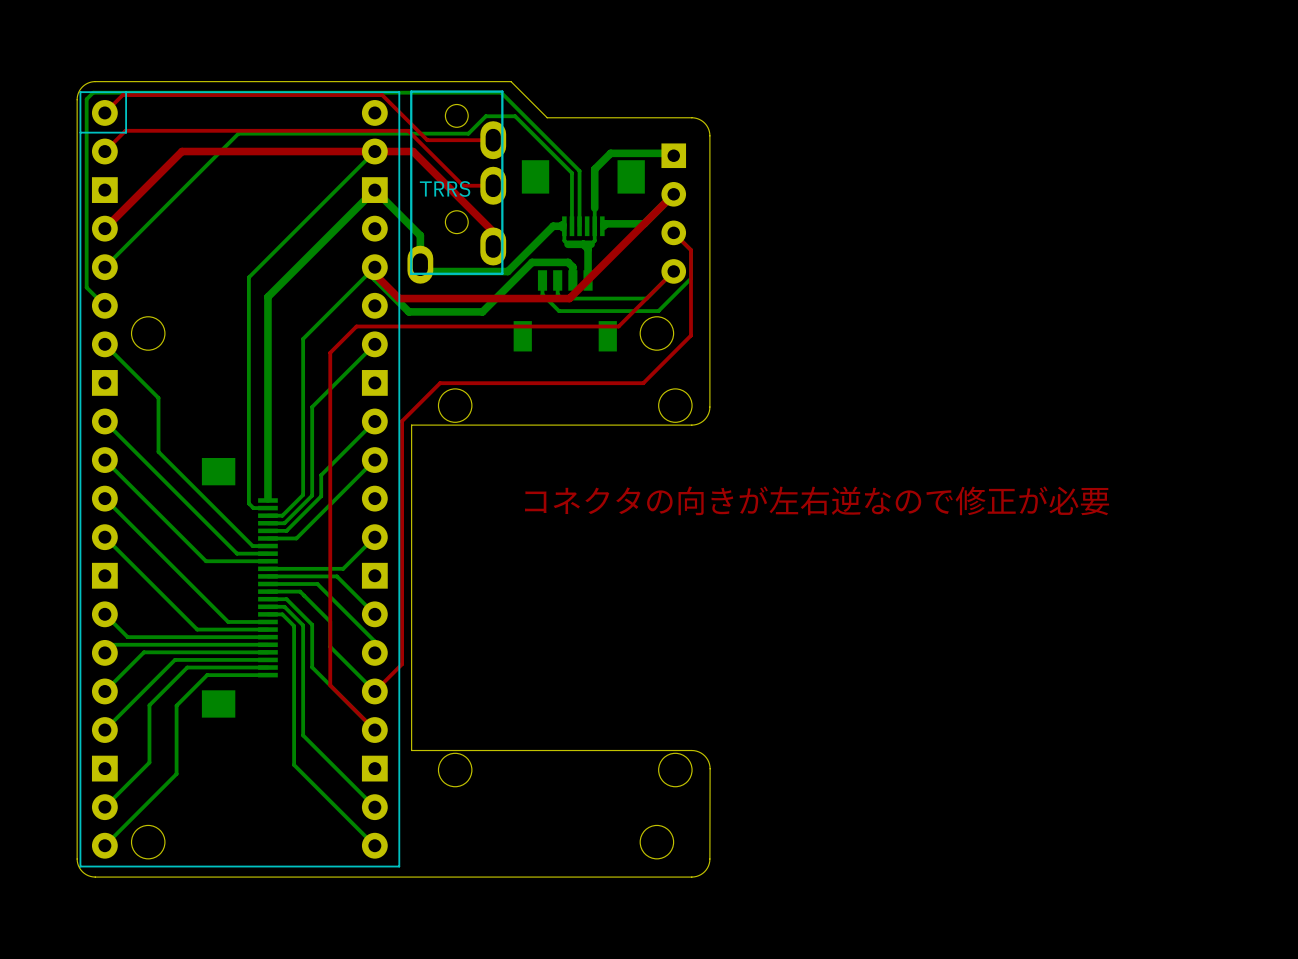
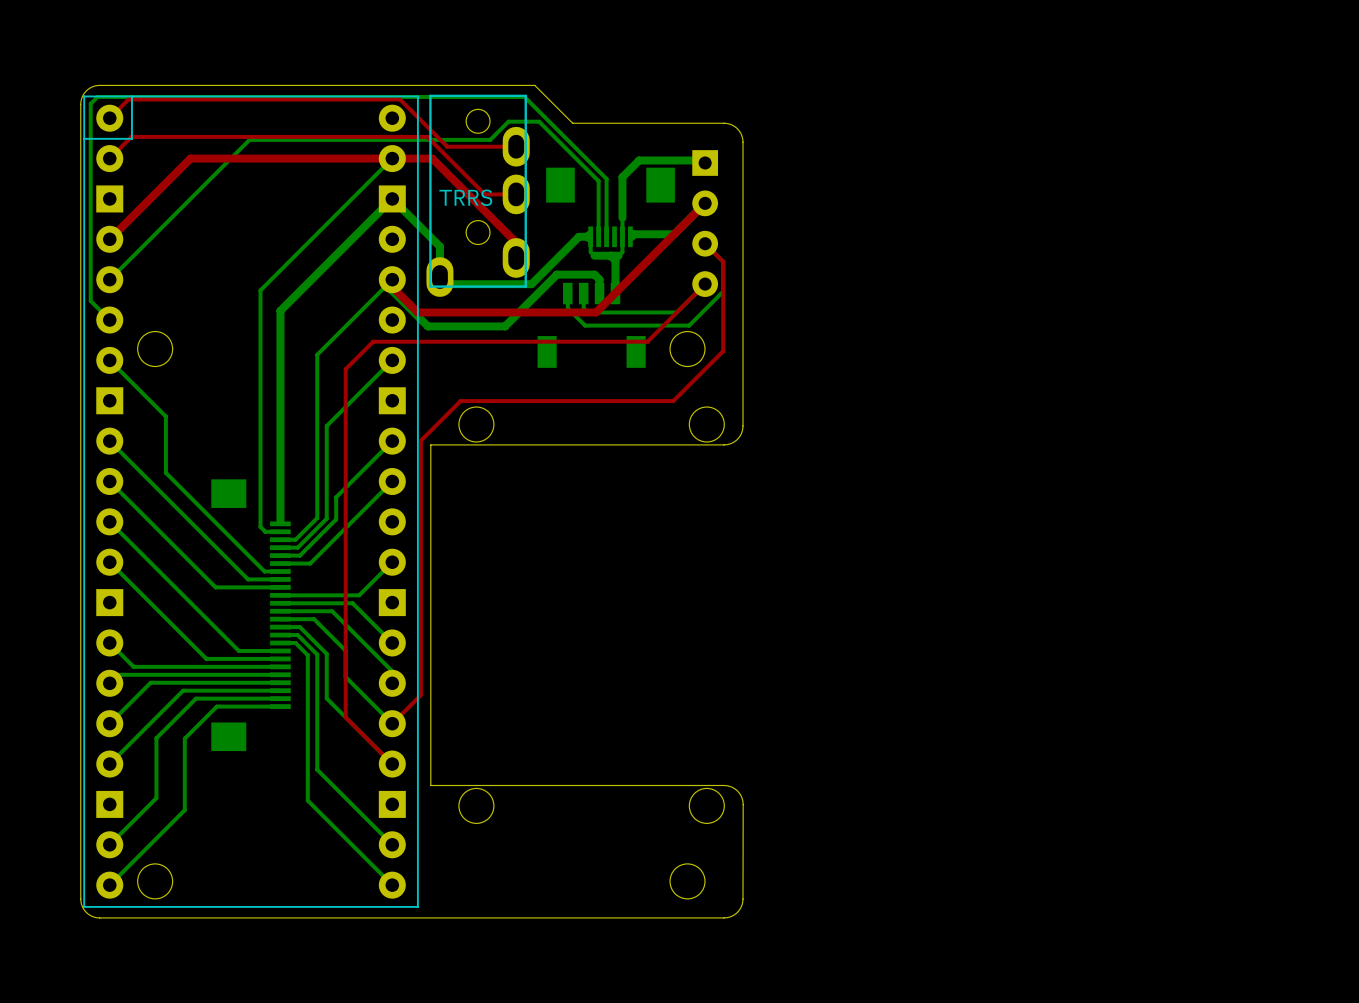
text: コネクタの向きが左右逆なので修正が必要 (817, 500) -> none

